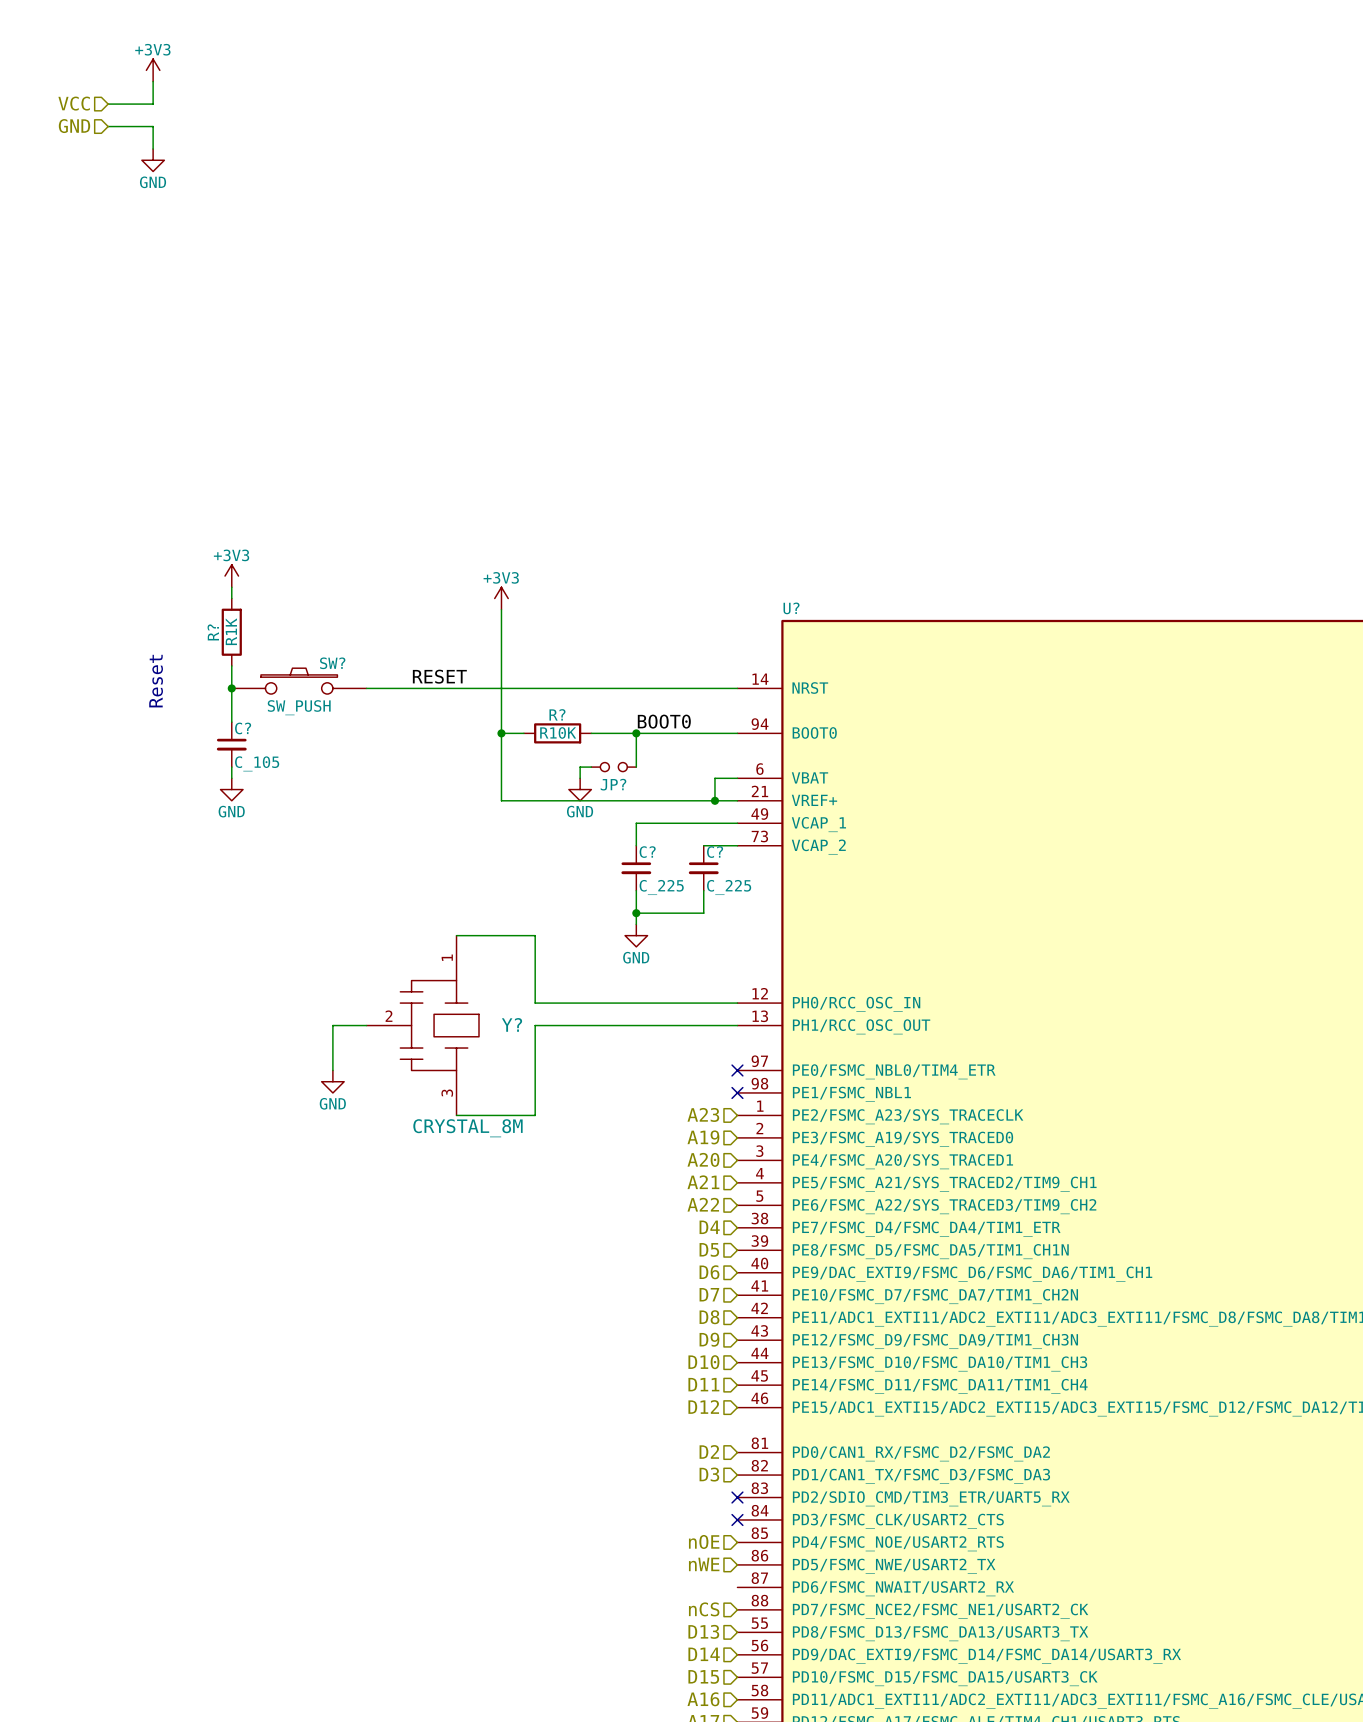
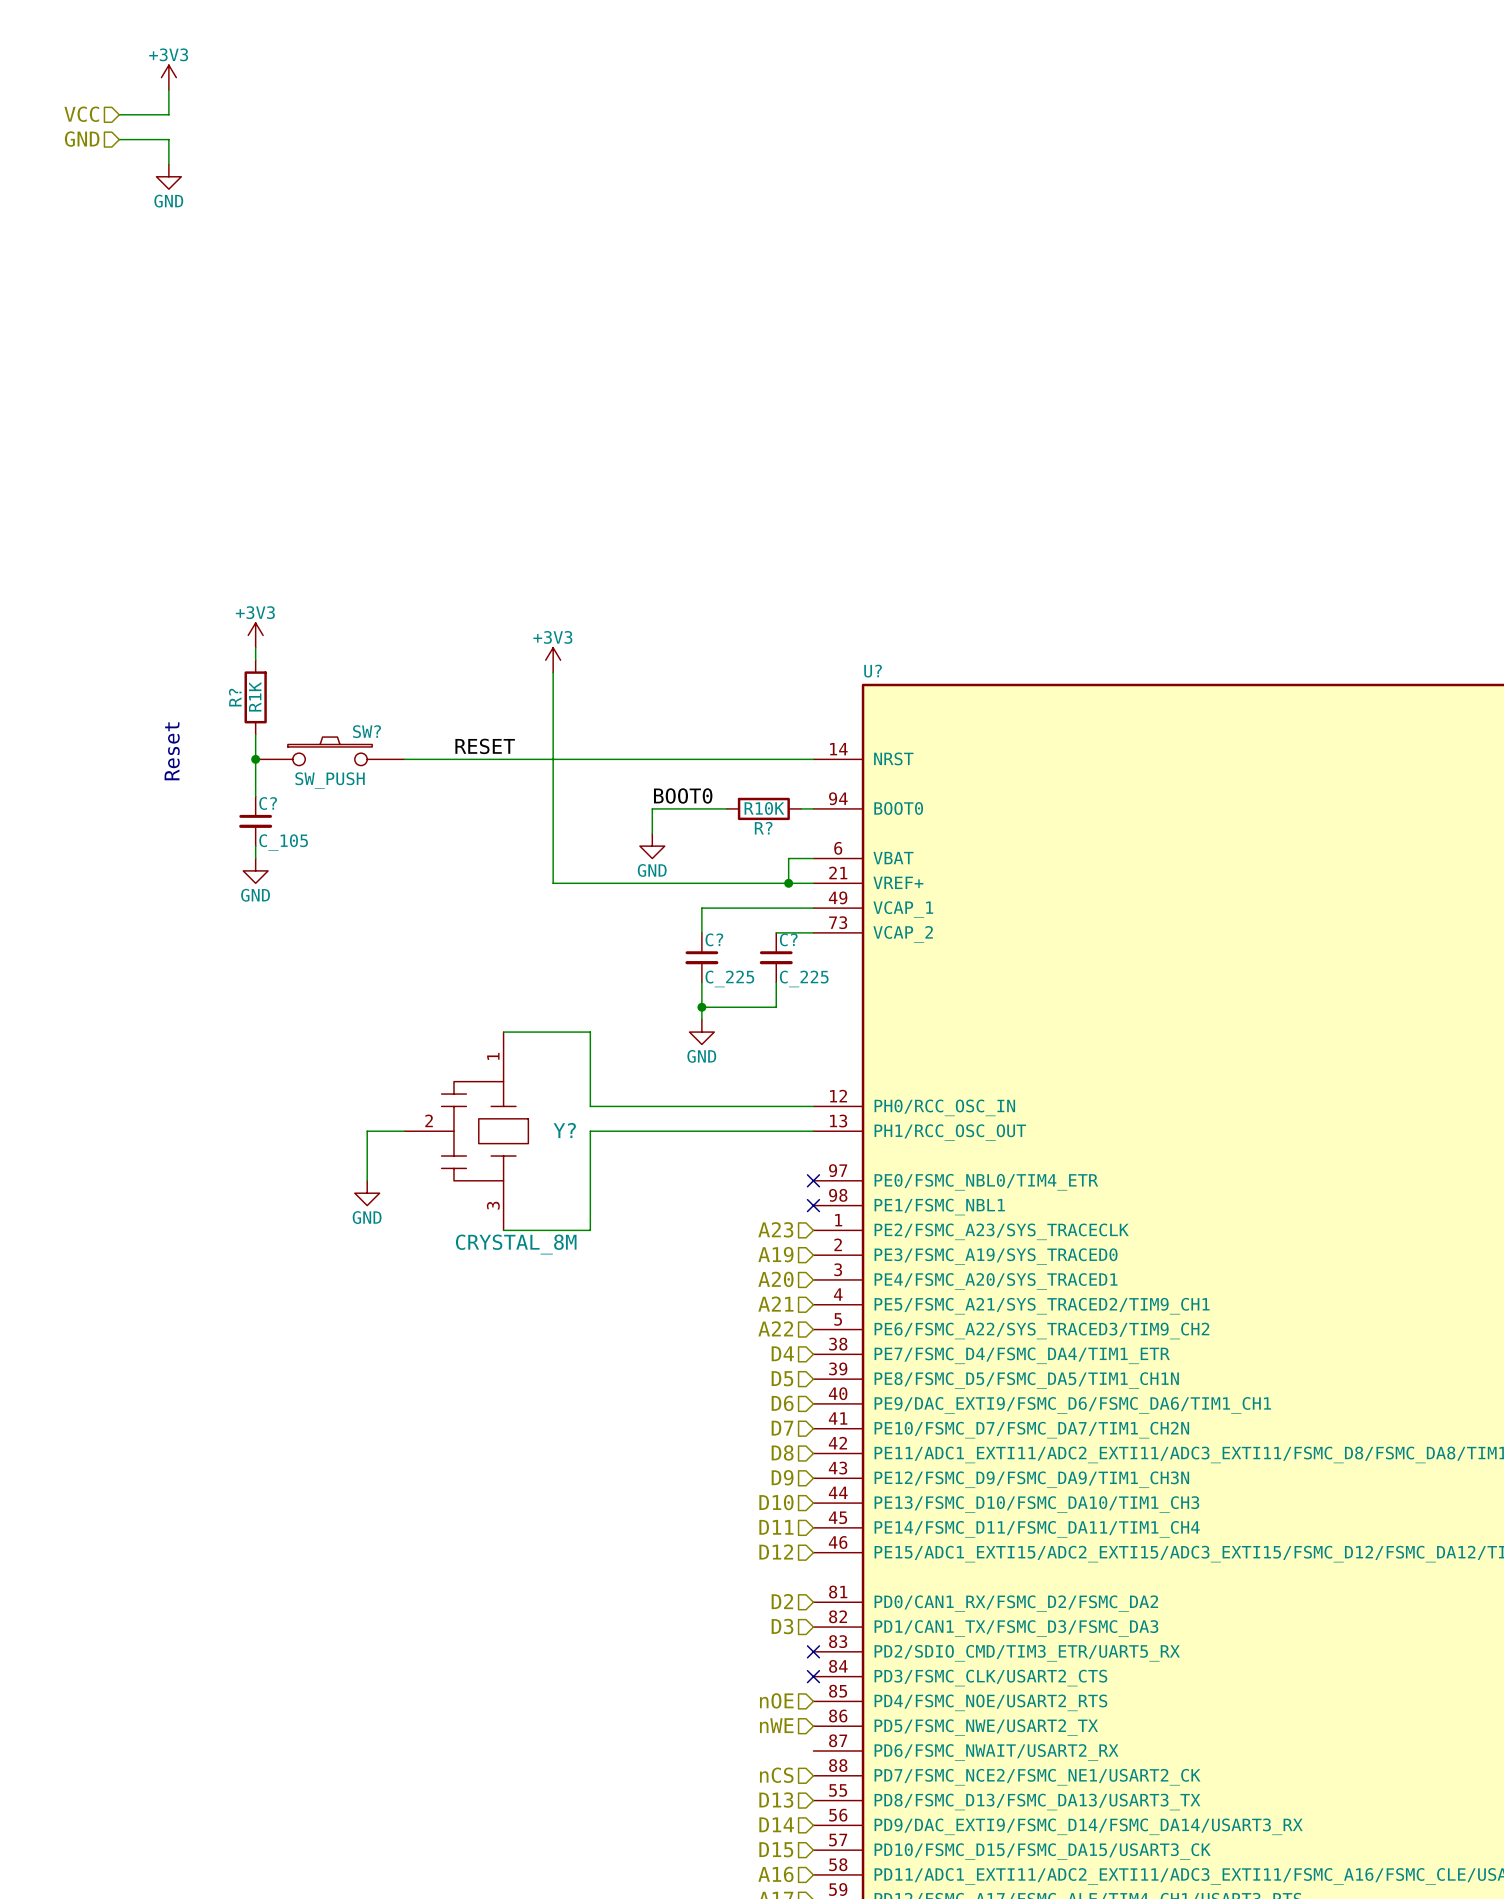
R? name position: R? (557, 714) -> R? (763, 828)
label position: BOOT0 (664, 721) -> BOOT0 (683, 795)
wire: (501, 733) (523, 733) -> none
junction: (501, 733) -> none
R? position: (557, 733) -> (763, 808)
wire: none -> (652, 808) (652, 833)
wire: (636, 733) (636, 767) -> none
junction: (636, 733) -> none
JP?: (613, 767) -> none
power symbol position: GND (580, 789) -> GND (652, 846)

